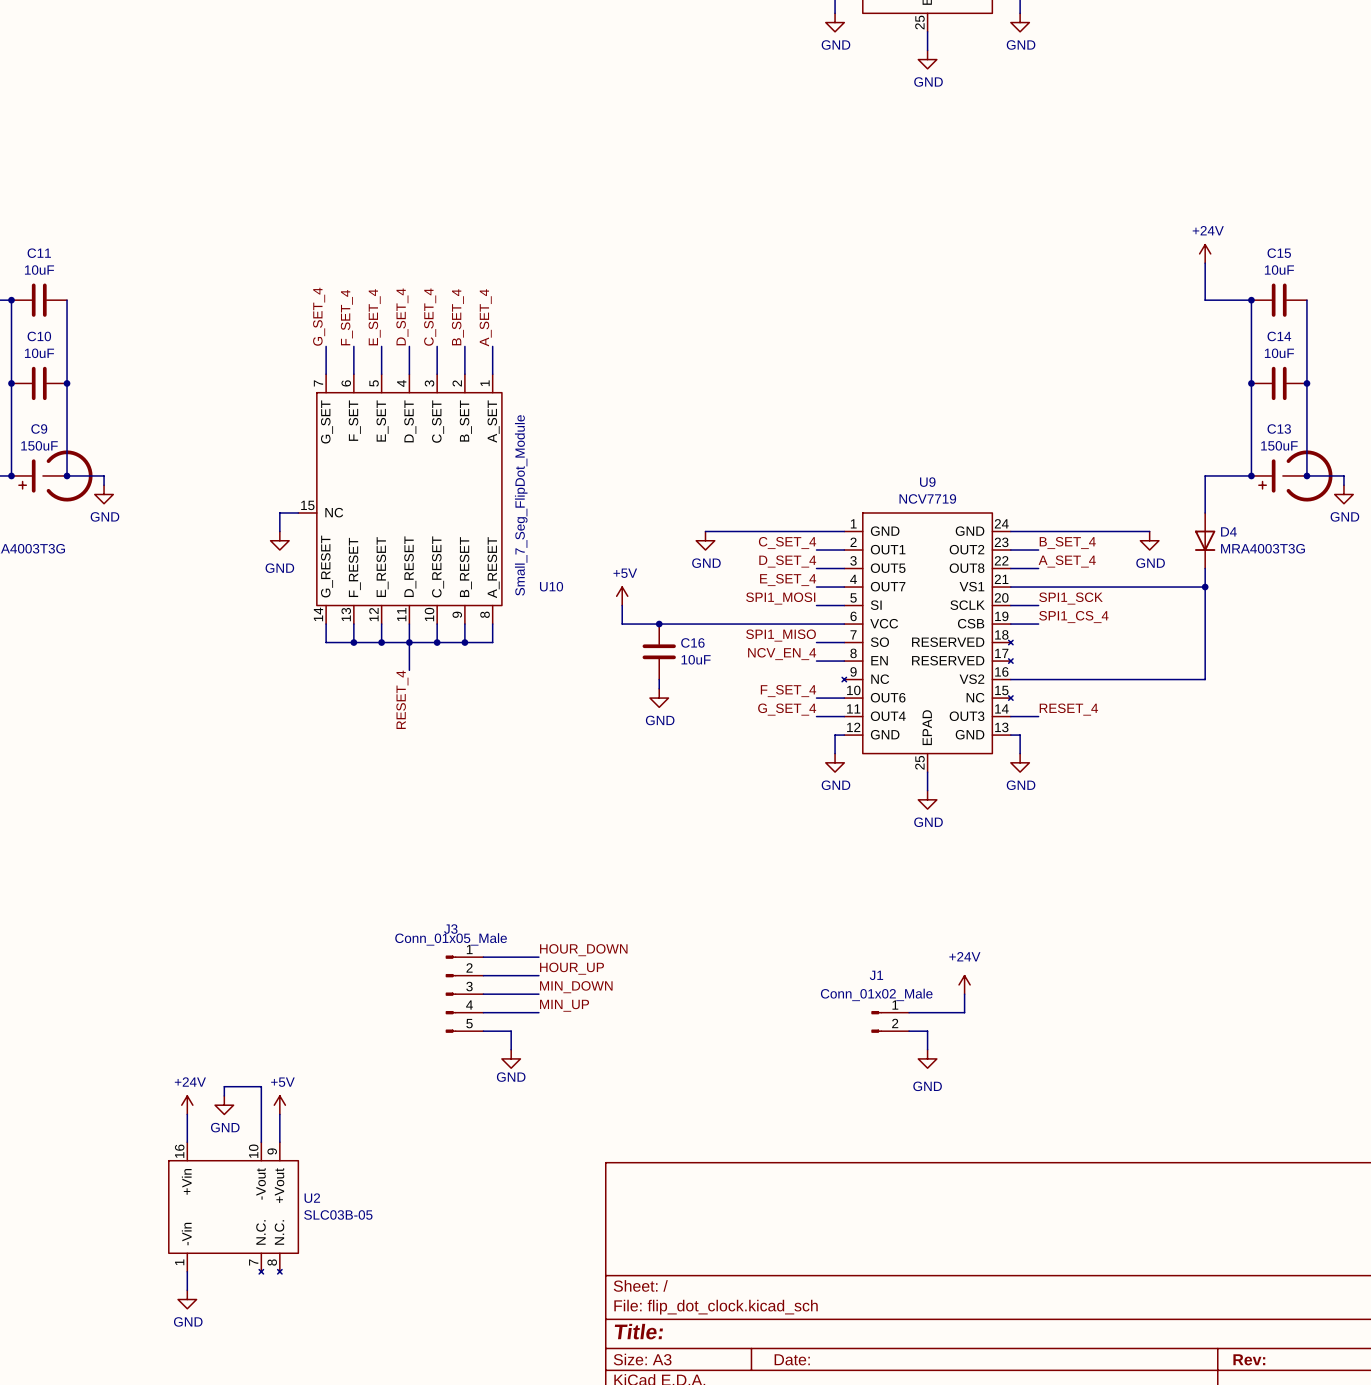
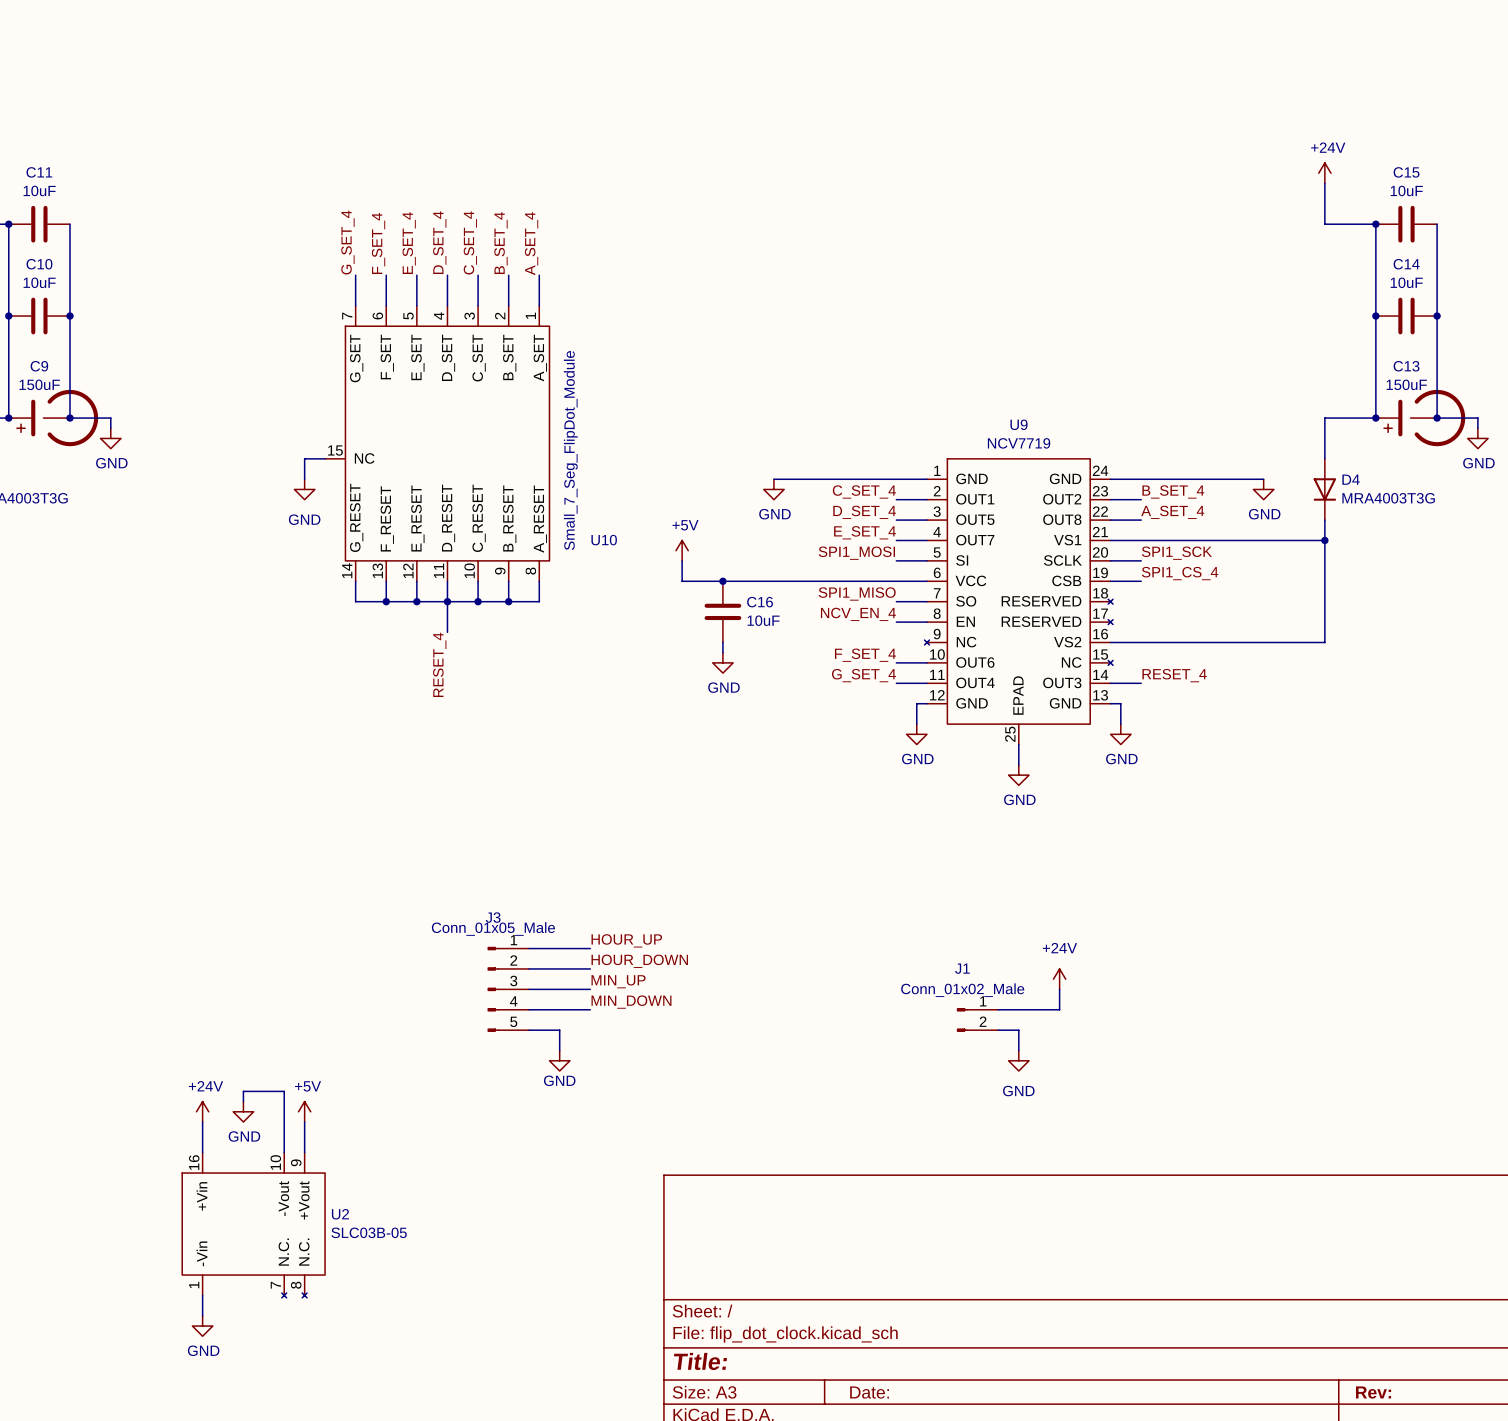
label: HOUR_DOWN (583, 950) -> HOUR_UP (626, 940)
label: HOUR_UP (572, 968) -> HOUR_DOWN (639, 961)
label: MIN_DOWN (576, 987) -> MIN_UP (618, 981)
label: MIN_UP (564, 1005) -> MIN_DOWN (631, 1002)

